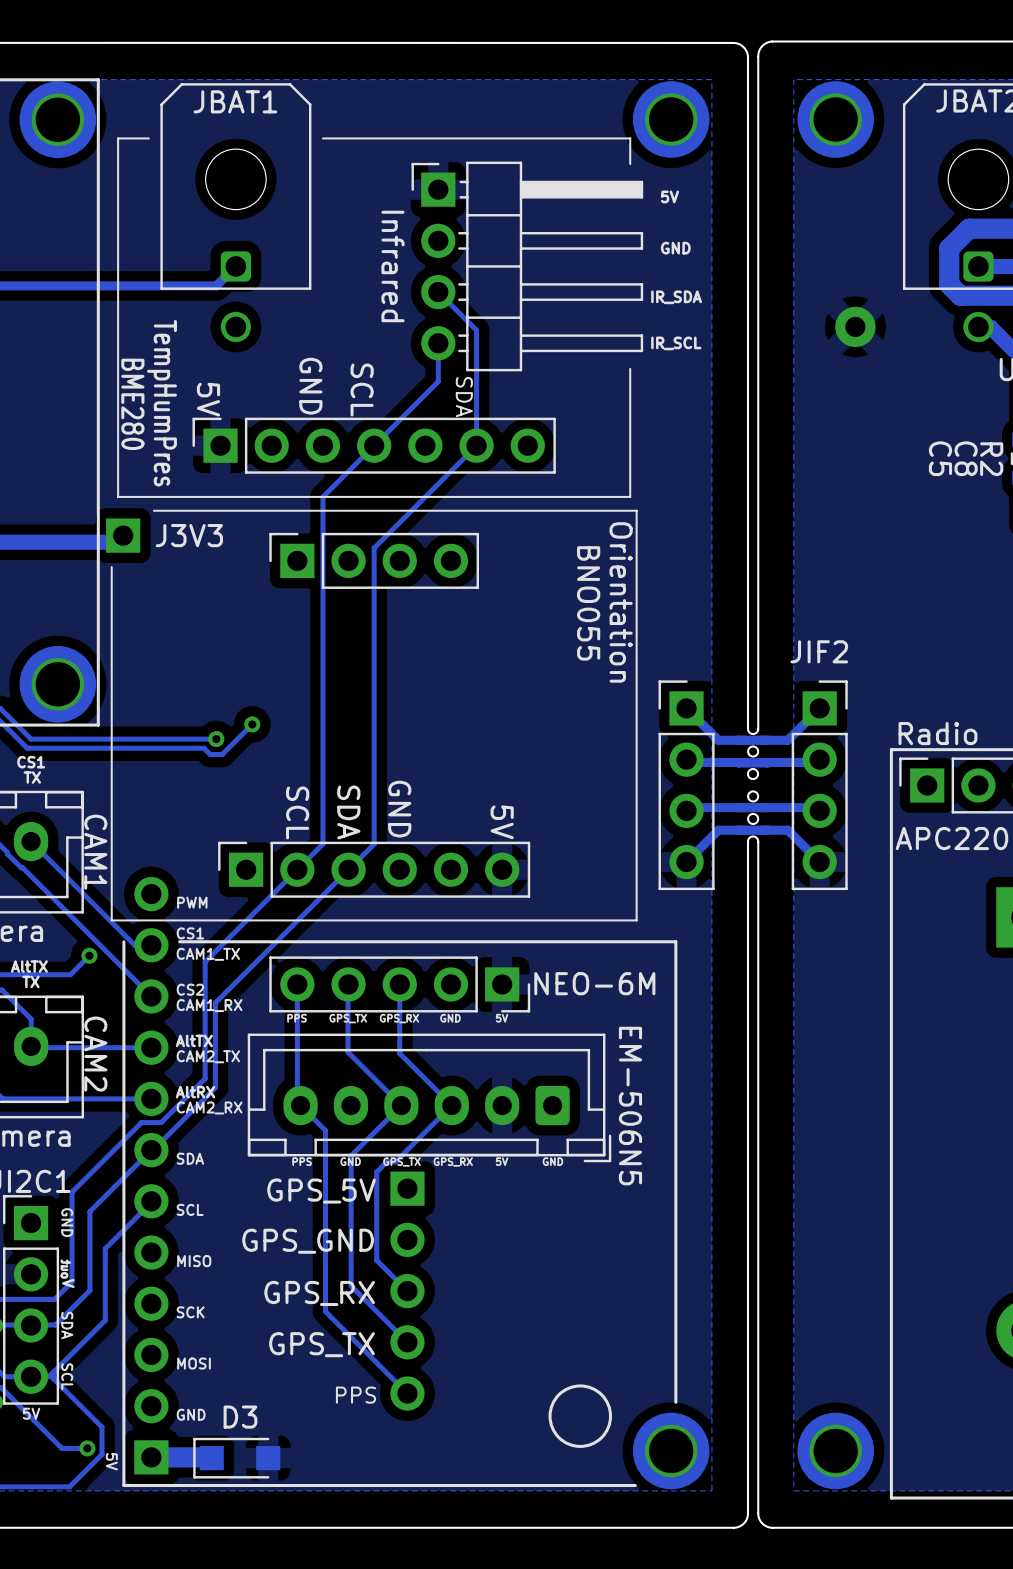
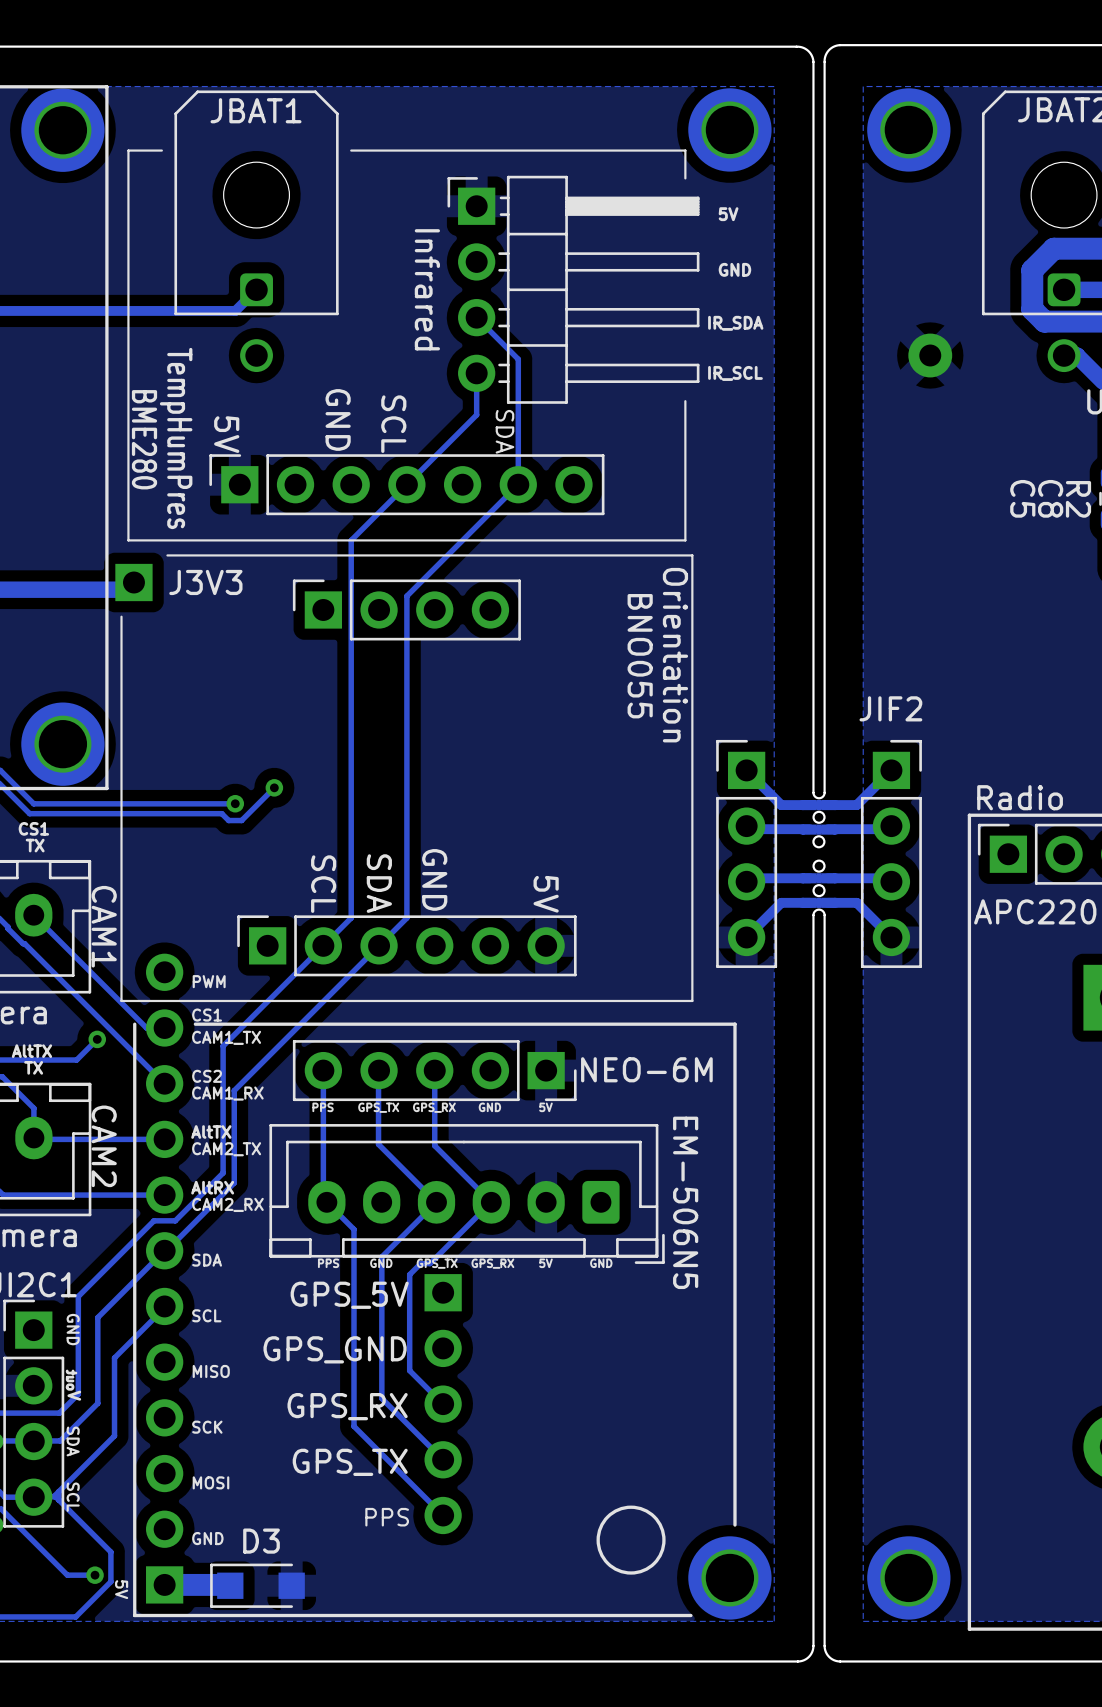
text: 5V (31, 1413) -> none

